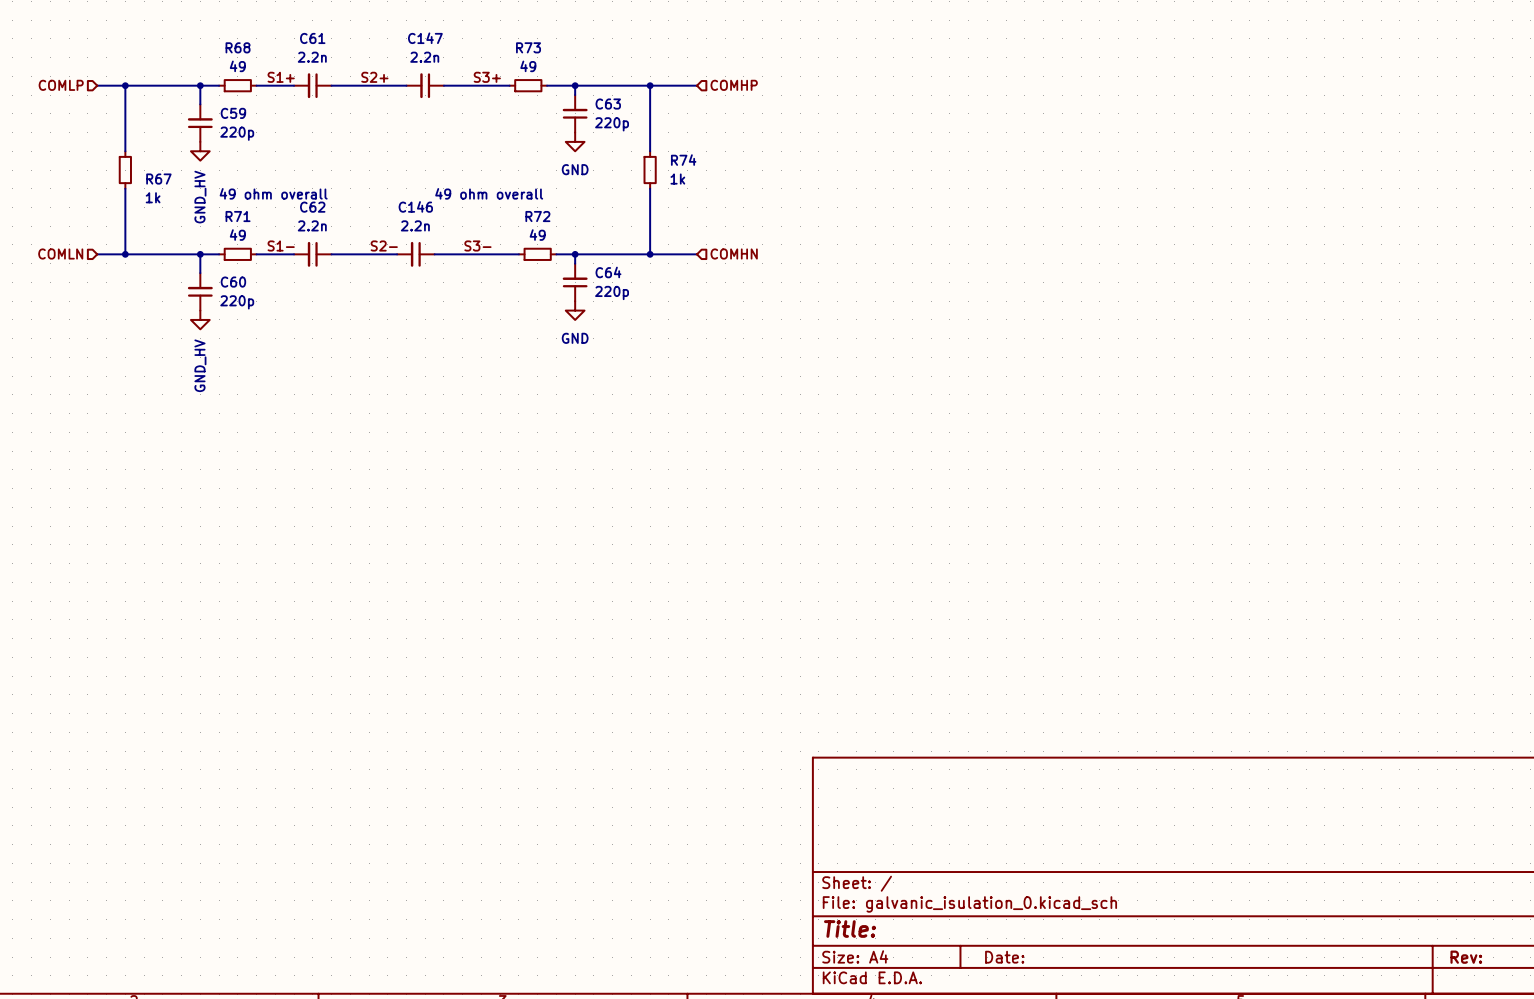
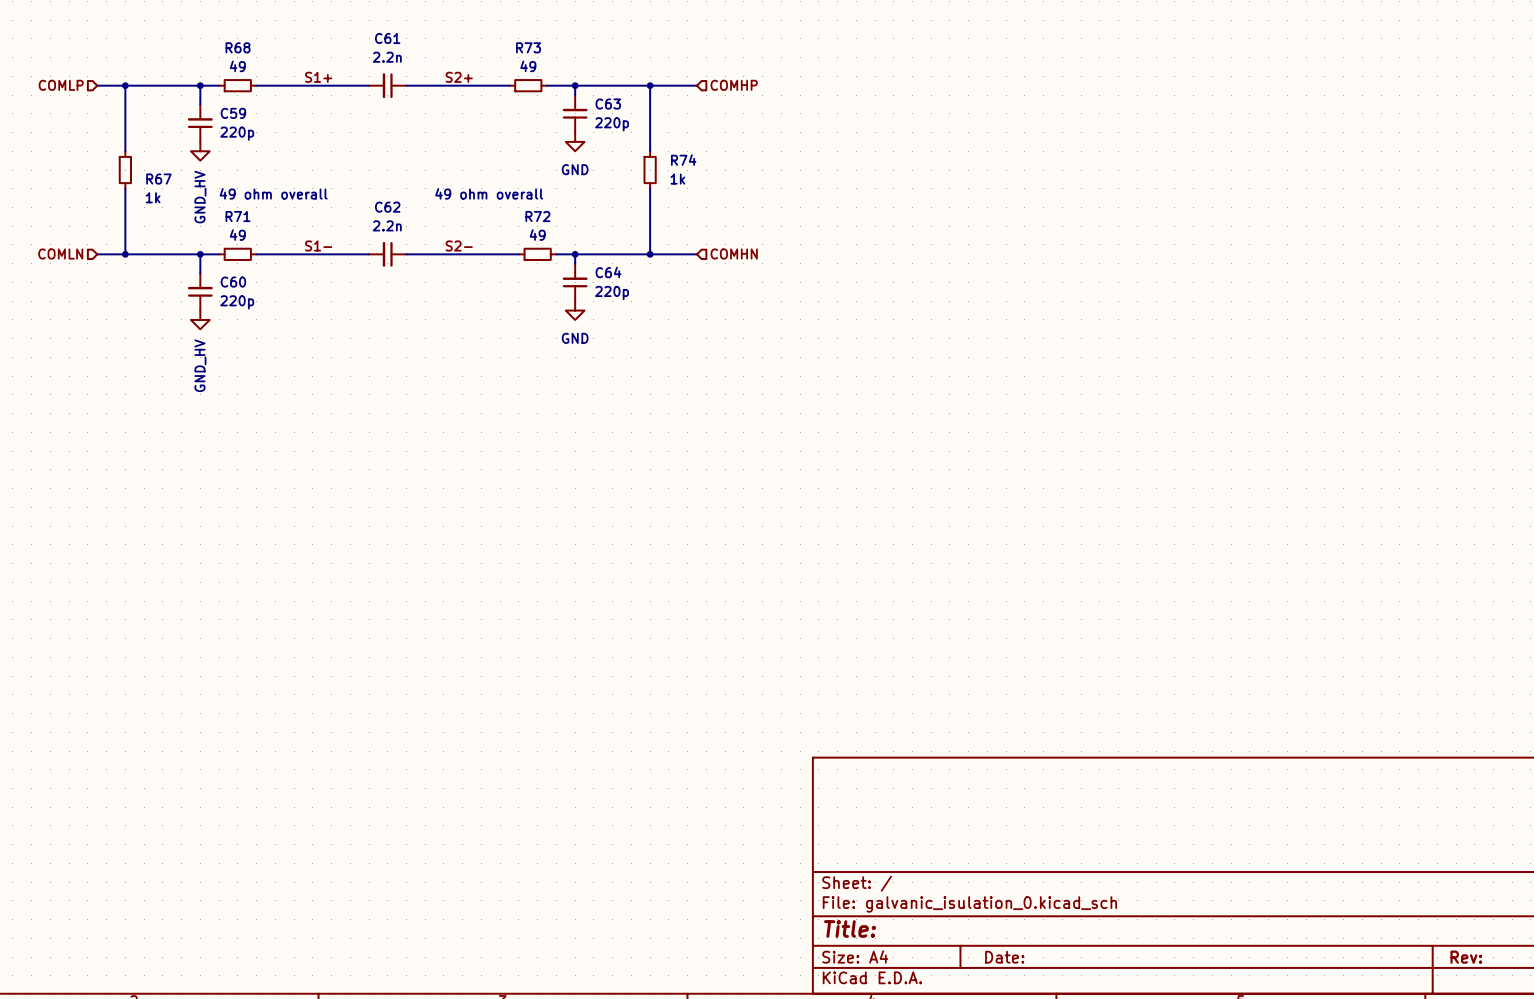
label position: S1+ (281, 77) -> S1+ (318, 77)
label position: S2+ (374, 77) -> S2+ (459, 77)
label: S3+ (487, 77) -> none
C61 position: (312, 85) -> (387, 85)
C147: 2.2n (425, 85) -> none
label position: S1- (281, 245) -> S1- (318, 245)
label position: S2- (384, 245) -> S2- (459, 245)
label: S3- (477, 245) -> none
C62 position: (312, 254) -> (387, 254)
C146: 2.2n (415, 254) -> none

